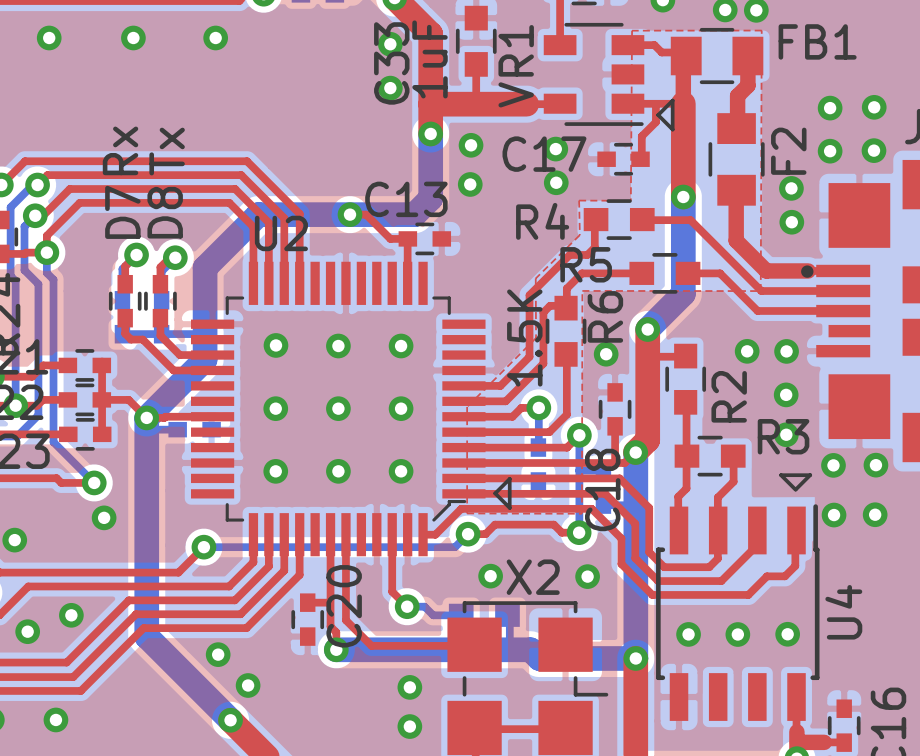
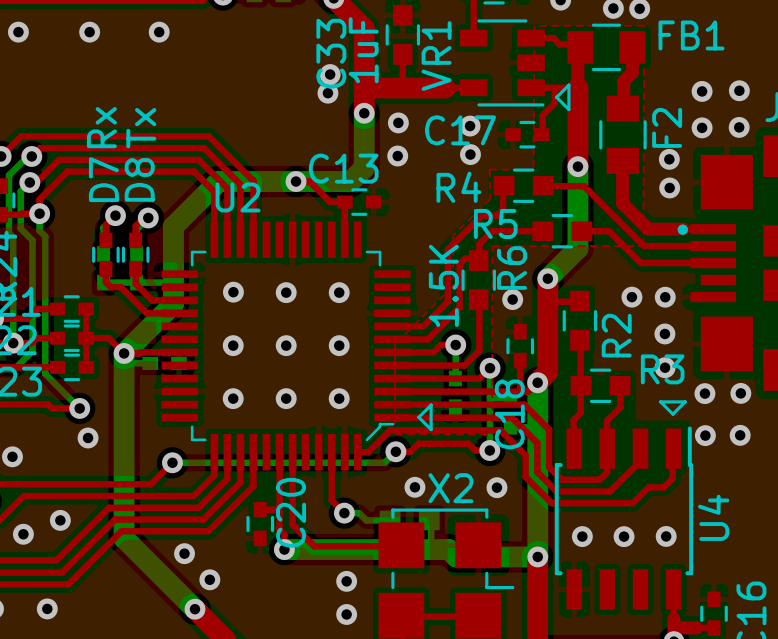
via: none -> (18, 32)
via: (49, 37) -> none
via: none -> (89, 32)
via: (133, 37) -> none
via: none -> (159, 32)
via: (215, 37) -> none
via position: (390, 44) -> (327, 93)

